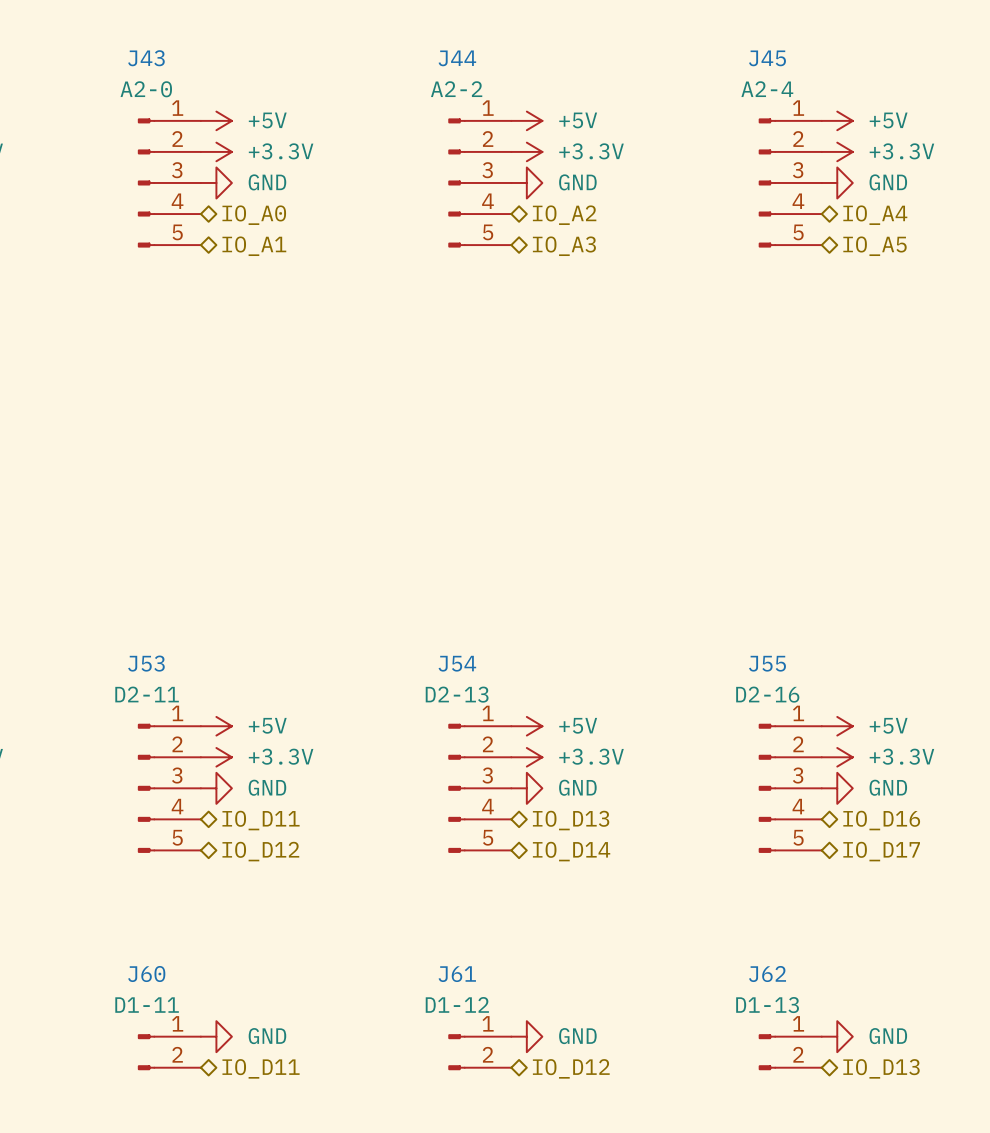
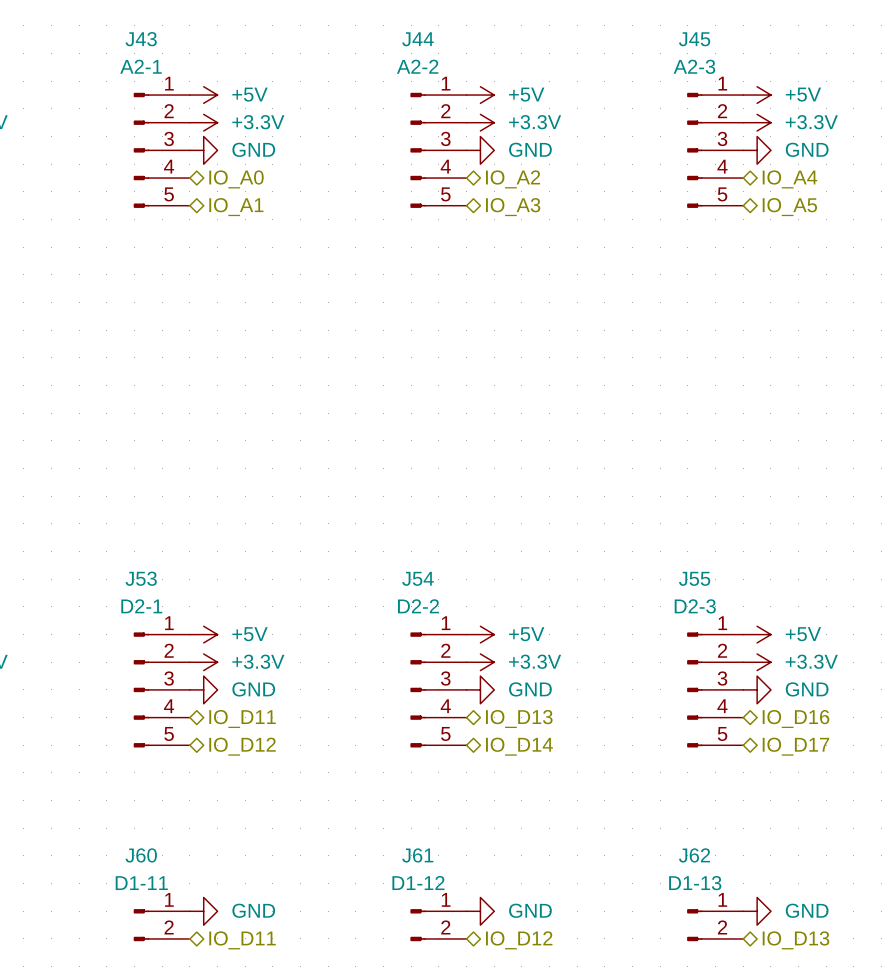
J43 value: A2-0 (146, 89) -> A2-1 (140, 66)
J45 value: A2-4 (767, 89) -> A2-3 (694, 66)
J53 value: D2-11 (147, 694) -> D2-1 (141, 606)
J54 value: D2-13 (457, 694) -> D2-2 (418, 606)
J55 value: D2-16 (767, 694) -> D2-3 (695, 606)

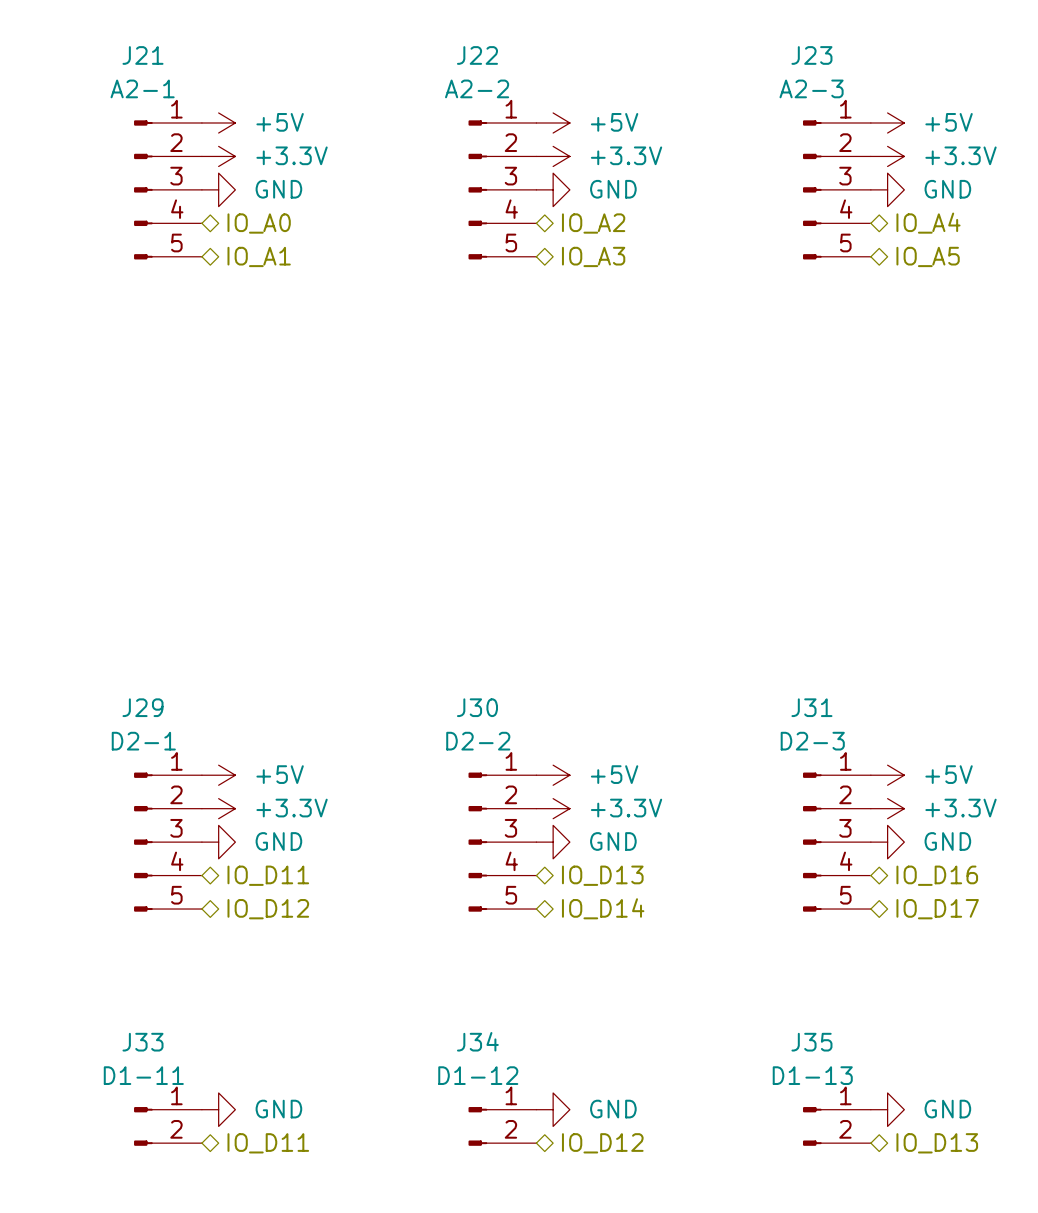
J43 name: J43 (141, 39) -> J21 (143, 55)
J44 name: J44 (418, 39) -> J22 (477, 55)
J45 name: J45 (694, 39) -> J23 (811, 55)
J53 name: J53 (141, 578) -> J29 (143, 707)
J54 name: J54 (418, 578) -> J30 (477, 707)
J55 name: J55 (694, 578) -> J31 (811, 707)
J60 name: J60 (141, 855) -> J33 (143, 1042)
J61 name: J61 (417, 855) -> J34 (477, 1041)
J62 name: J62 (694, 855) -> J35 (811, 1042)

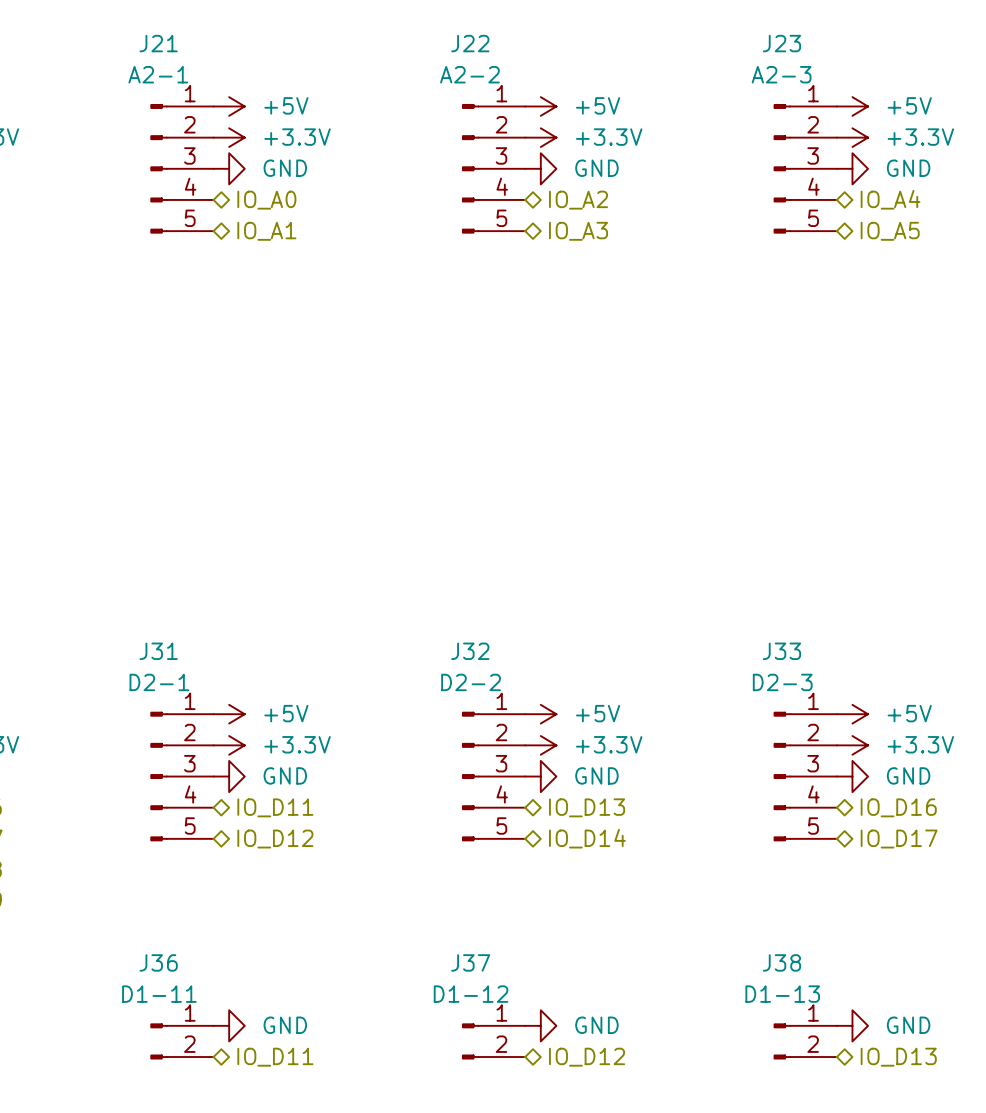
J29 name: J29 (143, 707) -> J31 (158, 651)
J30 name: J30 (477, 707) -> J32 (470, 651)
J31 name: J31 (811, 707) -> J33 (781, 651)
J34 name: J34 (477, 1041) -> J37 (470, 962)
J33 name: J33 (143, 1042) -> J36 (158, 962)
J35 name: J35 (811, 1042) -> J38 (781, 962)

